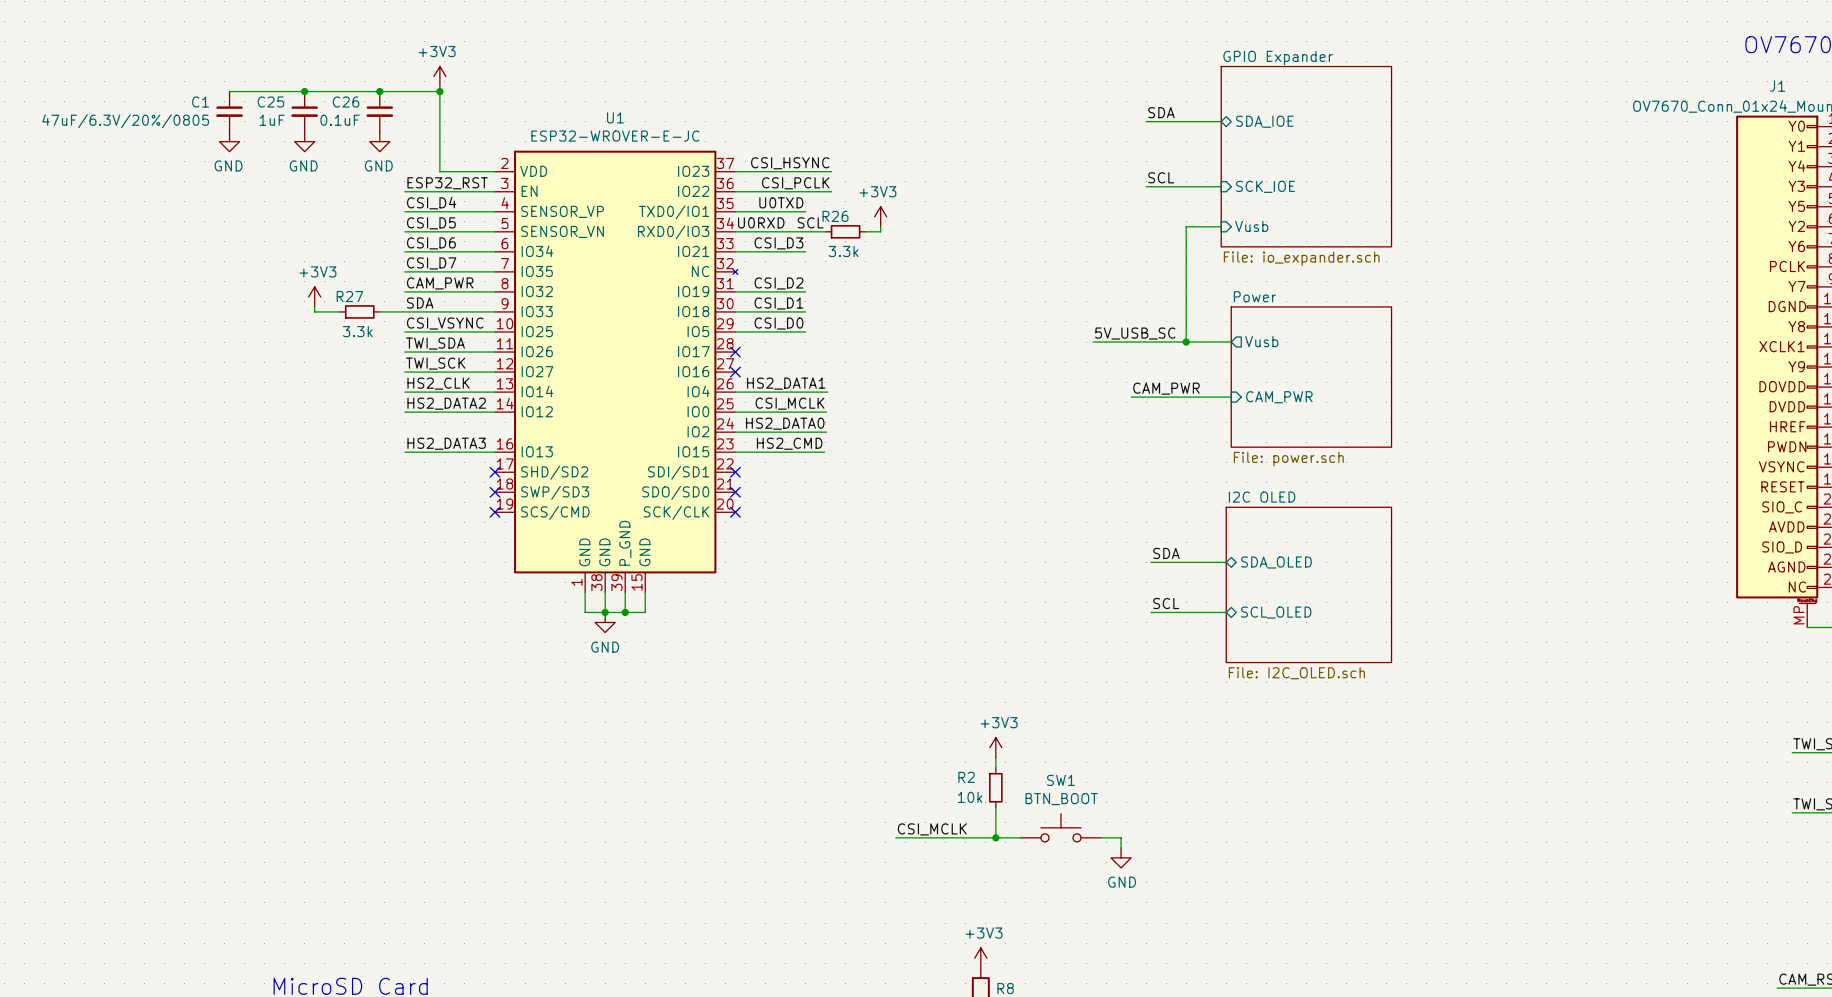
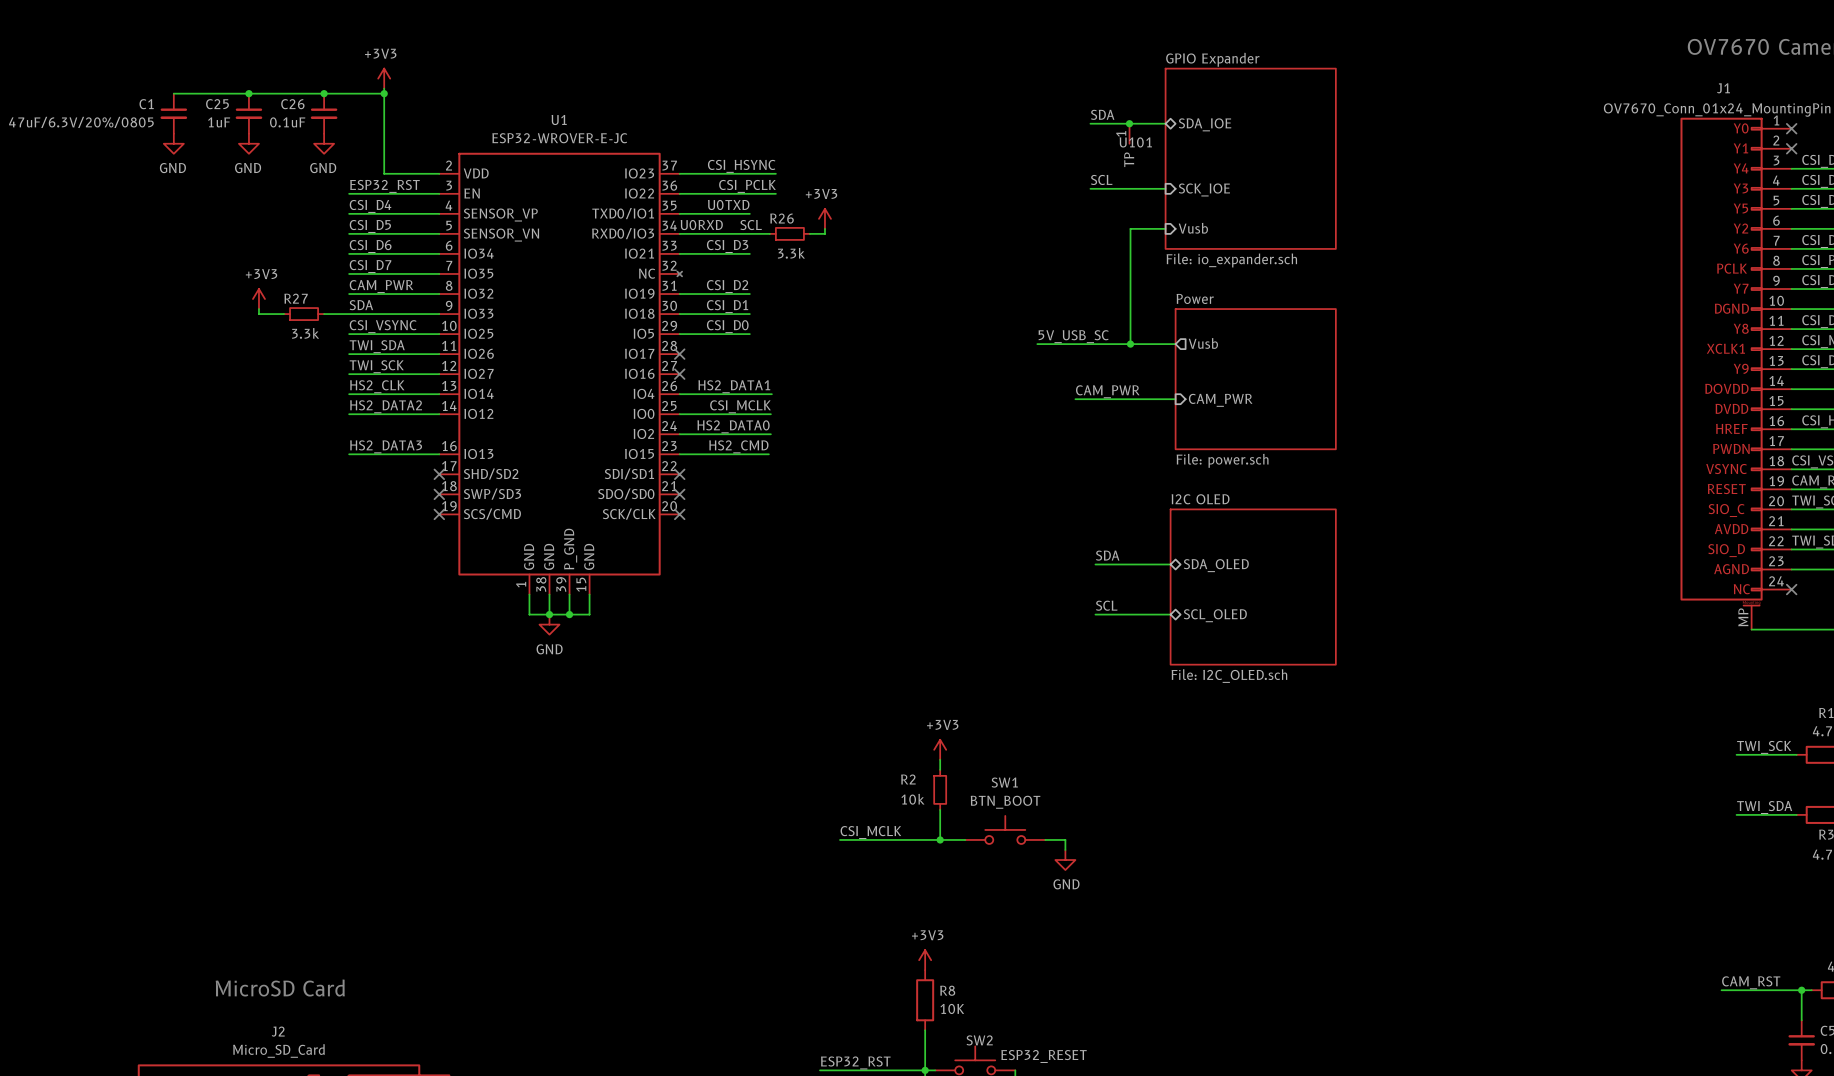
junction: none -> (1129, 123)
U101: none -> (1129, 133)

